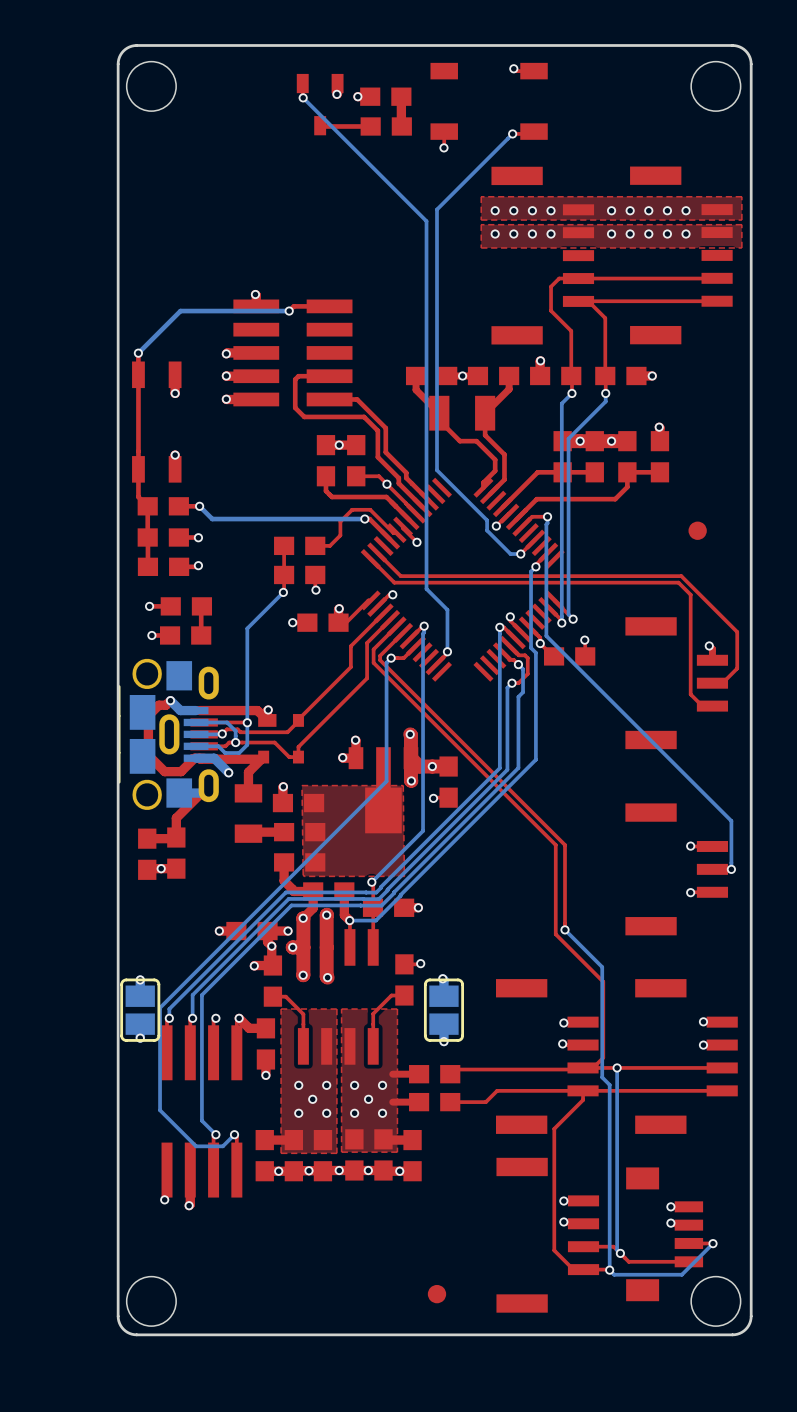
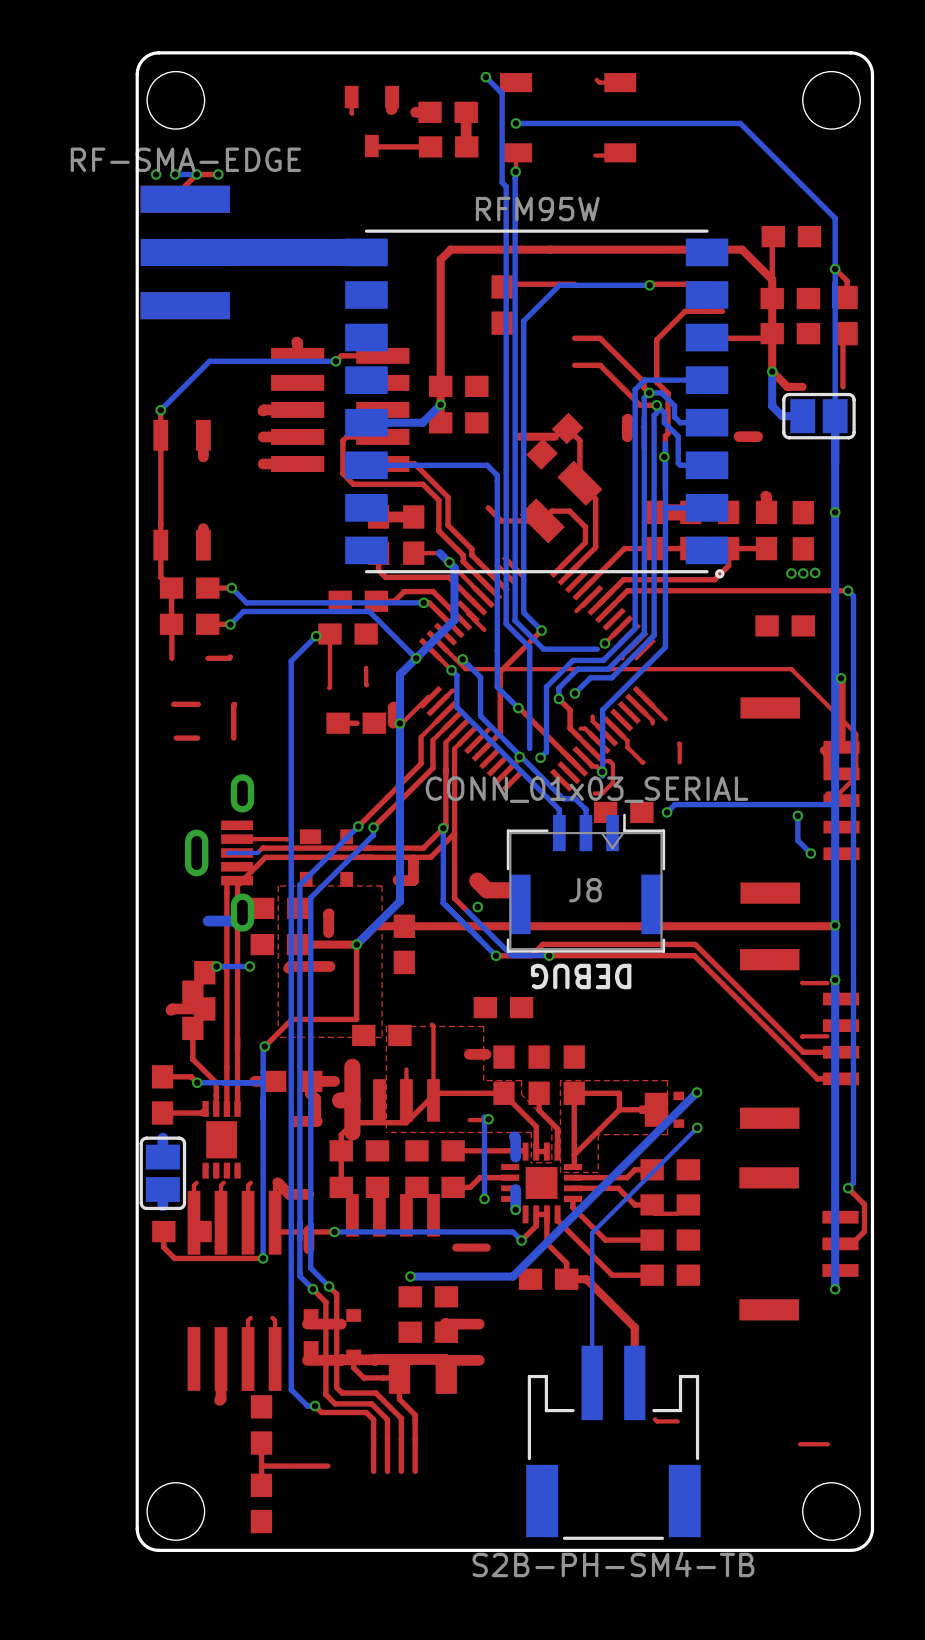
bottom track: none -> (485, 77) (502, 93) (502, 182) (506, 186) (506, 624) (529, 647) (529, 748)
via: none -> (485, 77)
via: (513, 68) -> none
via: (336, 94) -> none
via: (357, 96) -> none
bottom track: (303, 97) (426, 221) (426, 588) (447, 609) (447, 651) -> none
via: (303, 97) -> none
bottom track: none -> (515, 123) (740, 123) (835, 218) (835, 1289)
via: none -> (515, 123)
bottom track: (512, 133) (436, 209) (436, 470) (487, 520) (487, 530) (510, 554) (520, 554) -> none
via: (512, 133) -> none
via: none -> (156, 174)
via: none -> (175, 174)
bottom track: none -> (196, 174) (175, 174)
via: none -> (196, 174)
top track: none -> (218, 174) (196, 174) (185, 185)
via: none -> (218, 174)
bottom track: none -> (515, 177) (515, 620) (543, 649) (597, 649)
part footprint: [630, 166, 733, 345] -> [760, 287, 821, 310]
top zone outline: (741, 196) (741, 220) (481, 220) (481, 196) (741, 196) -> none
top track: none -> (773, 236) (772, 298)
part: none -> (791, 236)
via: (495, 210) -> none
via: (513, 210) -> none
via: (532, 210) -> none
via: (551, 210) -> none
via: (611, 210) -> none
via: (630, 210) -> none
via: (648, 210) -> none
via: (667, 210) -> none
via: (686, 210) -> none
part: none -> RF-SMA-EDGE (185, 252)
bottom track: none -> (366, 252) (185, 252)
top zone outline: (741, 224) (741, 247) (481, 247) (481, 224) (741, 224) -> none
top track: none -> (835, 269) (847, 280) (847, 297)
via: none -> (835, 269)
via: (495, 234) -> none
via: (513, 234) -> none
via: (532, 234) -> none
via position: (551, 234) -> (649, 285)
via: (611, 234) -> none
via: (630, 234) -> none
via: (648, 234) -> none
via: (667, 234) -> none
via: (686, 234) -> none
top track: none -> (574, 284) (504, 284) (502, 286)
top track: none -> (710, 284) (649, 285)
bottom track: none -> (649, 285) (559, 285) (523, 320) (523, 612) (541, 630) (542, 629)
part: (542, 255) -> none
part: none -> (502, 305)
top track: none -> (722, 311) (685, 311) (656, 339) (656, 382) (668, 393) (668, 433) (665, 436) (665, 443)
part: none -> (847, 315)
top track: (716, 278) (559, 278) (551, 286) (551, 310) (571, 331) (571, 393) -> none
part: none -> (790, 333)
top track: none -> (847, 333) (842, 337) (842, 386)
top track: none -> (574, 338) (600, 338) (643, 382) (643, 387) (649, 392)
top track: none -> (767, 338) (710, 338)
via: (255, 294) -> none
top track: (578, 301) (588, 301) (605, 318) (605, 393) -> none
top track: (717, 301) (578, 301) -> none
top track: none -> (574, 365) (600, 365) (640, 405) (656, 405)
bottom track: none -> (772, 371) (772, 406) (782, 416) (802, 416)
via: none -> (772, 371)
bottom track: none -> (707, 380) (644, 380) (635, 389) (635, 628) (603, 660) (573, 660) (546, 687) (546, 751) (540, 757)
part: none -> (458, 386)
top track: none -> (802, 386) (787, 386) (772, 371) (772, 279) (742, 249) (450, 249) (440, 259) (440, 422)
via: none -> (649, 392)
part: none -> RFM95W (536, 404)
bottom track: none -> (440, 404) (422, 422) (366, 422)
via: none -> (440, 404)
via: none -> (656, 405)
via: (226, 353) -> none
part: none -> (818, 416)
via: (540, 360) -> none
bottom track: none -> (707, 422) (680, 422) (674, 416) (674, 405) (661, 392) (649, 392) (644, 397) (644, 633) (608, 669) (577, 669) (558, 688) (558, 698)
part: none -> (458, 422)
via: (226, 375) -> none
top track: (416, 375) (416, 389) (439, 413) (439, 420) (459, 441) (476, 441) (495, 459) (495, 470) (483, 482) (483, 487) -> (488, 507) (501, 520) (542, 520) (552, 511) (569, 511) (585, 526) (585, 542) (561, 566)
part: (431, 375) -> none
via: (462, 375) -> none
part rotation: 0° (493, 375) -> 45° counterclockwise (554, 441)
top track: (509, 375) (509, 389) (485, 413) (485, 435) (504, 454) (504, 479) -> (567, 428) (579, 440) (579, 483) (595, 499) (595, 547) (585, 557)
part: (555, 375) -> none
part: (620, 375) -> none
via: (652, 375) -> none
bottom track: none -> (665, 443) (665, 647) (602, 709) (602, 776)
via: (175, 393) -> none
bottom track: (571, 393) (561, 403) (561, 623) -> none
bottom track: (605, 393) (605, 401) (568, 438) (568, 614) (573, 619) -> none
via: (605, 393) -> none
via: (226, 399) -> none
bottom track: none -> (359, 465) (487, 465) (497, 475) (497, 687) (518, 708)
bottom track: none -> (707, 465) (680, 465) (678, 463) (678, 436) (664, 422) (664, 412) (656, 405) (656, 412) (654, 415) (654, 635) (611, 677) (590, 677) (574, 693)
part: (462, 413) -> none
via: (659, 427) -> none
part: none -> (561, 502)
bottom track: none -> (707, 507) (665, 507)
via: (580, 441) -> none
via: (611, 441) -> none
via: none -> (835, 512)
via: (339, 445) -> none
via: (175, 455) -> none
part: none -> (803, 530)
bottom track: none -> (439, 553) (454, 567) (454, 620) (399, 674) (399, 901) (356, 944)
via: none -> (791, 573)
via: none -> (803, 573)
via: none -> (815, 572)
bottom track: none -> (848, 590) (853, 596) (853, 1182) (848, 1188)
via: none -> (848, 590)
top track: (352, 509) (370, 509) (393, 533) (396, 533) -> (376, 601) (394, 601) (404, 591) (433, 591) (460, 619)
top track: (352, 510) (340, 521) (340, 535) (329, 545) (315, 545) -> none
top track: (547, 516) (532, 516) -> (848, 590) (627, 590) (618, 600)
bottom track: (547, 516) (546, 635) (731, 821) (731, 869) -> none
via: (547, 516) -> none
via: (496, 526) -> none
part: (697, 530) -> none
bottom track: none -> (231, 623) (243, 611) (369, 611) (416, 658)
part: none -> (785, 625)
via: (416, 542) -> none
via: none -> (541, 630)
bottom track: none -> (316, 636) (291, 661) (291, 1389) (307, 1406) (315, 1406)
via: none -> (316, 636)
via: (198, 565) -> none
part: (163, 566) -> none
via: none -> (416, 658)
bottom track: (535, 566) (531, 571) (531, 647) (535, 652) (535, 759) (375, 920) (349, 920) -> none
via: (535, 566) -> none
bottom track: none -> (462, 659) (480, 677) (480, 716) (563, 798) (575, 798) (585, 809) (585, 833)
via: none -> (462, 659)
part position: (299, 574) -> (358, 601)
top track: (388, 577) (394, 582) (678, 582) (690, 594) (690, 694) (702, 706) (712, 706) -> none
bottom track: none -> (451, 670) (456, 675) (456, 707) (559, 809) (559, 833)
via: none -> (451, 670)
top track: none -> (841, 678) (841, 747)
via: none -> (841, 678)
via: (315, 590) -> none
bottom track: (283, 592) (247, 628) (247, 744) (239, 753) (225, 753) (218, 746) (196, 746) -> none
via: (283, 592) -> none
via: (392, 594) -> none
via: none -> (574, 693)
top track: none -> (558, 698) (570, 710) (570, 728) (580, 738)
via: none -> (558, 698)
via: (149, 606) -> none
part: (186, 606) -> none
via position: (339, 608) -> (399, 723)
top track: none -> (518, 708) (576, 765)
via: none -> (518, 708)
via: (510, 616) -> none
part footprint: [625, 617, 729, 750] -> [740, 697, 860, 904]
via: (573, 619) -> none
via: (292, 622) -> none
part position: (322, 622) -> (356, 723)
via: (561, 623) -> none
bottom track: (424, 626) (423, 830) (371, 882) -> none
via: (424, 626) -> none
bottom track: (499, 627) (499, 768) (376, 892) (285, 892) (169, 1009) (169, 1018) -> none
via: (499, 627) -> none
top track: (362, 634) (350, 646) (350, 667) (287, 732) (240, 732) (237, 729) (226, 729) -> (421, 737) (421, 763) (358, 826)
via: (151, 635) -> none
part: (185, 635) -> none
top track: (372, 637) (367, 642) (367, 678) (298, 746) (298, 757) (289, 757) (274, 742) (229, 742) (225, 746) (199, 746) -> (432, 740) (432, 768) (373, 827)
top track: (383, 639) (373, 649) (373, 662) (555, 845) (555, 934) (603, 981) (603, 1057) (593, 1067) -> (445, 742) (445, 825) (423, 848) (262, 848)
via: (584, 640) -> none
via: (540, 643) -> none
top track: (391, 644) (380, 655) (380, 660) (565, 845) (565, 929) -> (454, 748) (454, 898) (467, 911)
top track: (416, 645) (403, 658) (391, 658) -> (483, 750) (500, 733) (500, 671) (541, 630)
via: (709, 645) -> none
via: none -> (540, 757)
part position: (569, 656) -> (623, 812)
bottom track: (391, 658) (386, 662) (386, 781) (160, 1007) (160, 1110) (196, 1146) (222, 1146) (234, 1134) -> none
via: (391, 658) -> none
bottom track: (518, 664) (523, 669) (523, 692) (518, 696) (518, 767) (381, 905) (360, 905) -> none
bottom track: (512, 683) (507, 687) (507, 769) (378, 899) (363, 899) -> none
via: (512, 683) -> none
bottom track: none -> (834, 804) (674, 804) (667, 812)
via: none -> (667, 812)
top track: (170, 700) (165, 705) (158, 705) (148, 715) (148, 755) (164, 771) (181, 771) (194, 758) (204, 758) -> none
bottom track: (170, 700) (180, 710) (196, 710) -> none
via: (170, 700) -> none
bottom track: none -> (797, 815) (797, 840) (810, 853)
via: none -> (797, 815)
top track: (268, 709) (267, 720) (257, 710) (199, 710) -> none
via: (268, 709) -> none
bottom track: none -> (358, 826) (299, 884) (299, 1276) (312, 1289)
via: none -> (358, 826)
bottom track: none -> (373, 827) (373, 835) (310, 897) (310, 1268) (329, 1286)
via: none -> (373, 827)
bottom track: none -> (443, 828) (443, 903) (496, 955)
via: none -> (443, 828)
top track: none -> (454, 833) (430, 857) (265, 857) (237, 885) (237, 1108)
bottom track: (196, 722) (227, 722) (235, 731) (235, 742) -> none
via: (247, 722) -> none
via: (222, 733) -> none
part: (163, 734) -> none
top track: (410, 734) (411, 780) -> none
via: (410, 734) -> none
via: none -> (810, 853)
via: (355, 740) -> none
via: (235, 742) -> none
top track: (263, 757) (248, 772) (248, 793) -> none
via: (342, 757) -> none
bottom track: (196, 758) (214, 758) (228, 772) -> none
top track: (199, 758) (261, 759) -> none
top track: none -> (226, 883) (226, 1108)
J8: none -> CONN_01x03_SERIAL (585, 883)
top zone outline: none -> (382, 885) (278, 885) (278, 1037) (382, 1037) (382, 885)
via: (432, 766) -> none
via: (228, 772) -> none
part: none -> (280, 908)
part: (448, 782) -> none
part footprint: [234, 784, 263, 843] -> [250, 933, 311, 956]
bottom track: none -> (467, 911) (511, 955) (549, 955)
top track: (208, 785) (176, 818) (175, 838) (147, 838) -> none
top zone outline: (403, 785) (302, 785) (303, 875) (404, 876) (403, 785) -> none
via: (283, 786) -> none
part: (383, 790) -> none
top track: none -> (835, 925) (375, 926) (356, 944)
via: none -> (835, 925)
via: (433, 798) -> none
part: (298, 803) -> none
top track: none -> (299, 943) (298, 944) (356, 944)
top track: none -> (356, 944) (356, 1019) (291, 1019) (264, 1046)
via: none -> (356, 944)
part: none -> (404, 944)
top track: none -> (496, 955) (531, 955) (542, 944) (695, 944) (803, 1052) (841, 1052)
via: none -> (496, 955)
top track: none -> (549, 955) (694, 955) (817, 1078) (841, 1078)
via: none -> (549, 955)
via: none -> (216, 966)
bottom track: none -> (249, 966) (216, 966)
via: none -> (249, 966)
part: (299, 832) -> none
text: none -> DEBUG (581, 976)
via: none -> (835, 980)
via: (690, 846) -> none
part position: (147, 854) -> (192, 1010)
top track: (284, 862) (284, 880) (293, 891) (313, 891) (313, 908) (303, 918) -> none
part: (299, 862) -> none
part: none -> (503, 1007)
via: (161, 868) -> none
part: (676, 869) -> none
via: (731, 869) -> none
via: (371, 882) -> none
top zone outline: none -> (483, 1026) (386, 1026) (386, 1132) (531, 1132) (531, 1162) (551, 1162) (551, 1124) (521, 1094) (521, 1080) (483, 1080) (483, 1026)
top track: none -> (192, 1028) (192, 1059) (216, 1082) (216, 1108)
top track: (344, 891) (344, 915) (349, 920) -> none
via: (690, 892) -> none
part: none -> (799, 1038)
bottom track: (363, 898) (288, 898) (192, 995) (192, 1018) -> none
bottom track: none -> (264, 1046) (263, 1048) (263, 1258)
via: none -> (264, 1046)
bottom track: (360, 905) (291, 905) (201, 995) (201, 1120) (215, 1134) -> none
part: (388, 907) -> none
via: (418, 907) -> none
top track: (327, 914) (327, 977) -> none
via: (326, 915) -> none
via: (303, 918) -> none
via: (349, 920) -> none
part: none -> (503, 1075)
part: none -> (539, 1075)
part: none -> (574, 1075)
top track: none -> (163, 1077) (191, 1076) (197, 1082)
bottom track: (565, 929) (602, 967) (602, 1077) (609, 1084) (609, 1270) (614, 1274) (681, 1274) (713, 1243) -> none
via: (565, 929) -> none
top zone outline: none -> (667, 1080) (560, 1080) (560, 1172) (598, 1172) (598, 1134) (667, 1134) (667, 1080)
via: (219, 931) -> none
via: (288, 931) -> none
bottom track: none -> (197, 1082) (263, 1083)
via: none -> (197, 1082)
bottom track: none -> (696, 1092) (512, 1276) (410, 1276)
via: none -> (696, 1092)
top track: none -> (539, 1093) (539, 1110) (557, 1128) (557, 1151)
part: none -> (162, 1094)
via: (271, 946) -> none
via: (292, 947) -> none
top track: none -> (205, 1108) (201, 1113) (162, 1113)
top track: none -> (619, 1109) (574, 1154)
top track: none -> (619, 1109) (619, 1093) (574, 1093) (572, 1167)
top track: none -> (656, 1109) (619, 1109)
part: none -> (661, 1109)
bottom track: none -> (484, 1117) (484, 1198)
via: (254, 965) -> none
bottom track: none -> (697, 1127) (592, 1232) (592, 1382)
via: none -> (697, 1127)
via: (303, 975) -> none
via: (327, 977) -> none
via: (442, 978) -> none
via: (140, 979) -> none
part: (404, 979) -> none
part footprint: [635, 979, 738, 1134] -> [739, 1167, 859, 1321]
part: none -> (221, 1139)
part: (272, 981) -> none
part: none -> (359, 1150)
part: none -> (435, 1150)
top track: none -> (453, 1150) (525, 1151)
top track: none -> (546, 1151) (536, 1151) (536, 1126) (503, 1093) (435, 1093) (406, 1122) (353, 1122) (341, 1134) (341, 1187)
top track: (404, 995) (391, 995) (373, 1013) (373, 1046) -> none
top track: (272, 996) (285, 996) (303, 1014) (303, 1046) -> none
top track: none -> (652, 1169) (635, 1169) (627, 1177) (572, 1177)
part: none -> (670, 1169)
top zone outline: (336, 1009) (336, 1153) (281, 1153) (281, 1009) (336, 1009) -> none
top zone outline: (397, 1009) (341, 1009) (341, 1152) (397, 1152) (397, 1009) -> none
part: (443, 1010) -> none
top track: none -> (510, 1177) (479, 1177) (470, 1187) (453, 1187)
via: (169, 1018) -> none
via: (192, 1018) -> none
via: (215, 1018) -> none
via: (239, 1018) -> none
part: none -> (541, 1182)
via: (703, 1021) -> none
part: none -> (359, 1187)
part: none -> (435, 1187)
via: (563, 1022) -> none
top track: none -> (848, 1188) (864, 1204) (864, 1231) (852, 1243) (840, 1243)
via: none -> (848, 1188)
top track: none -> (572, 1188) (618, 1188) (635, 1204) (652, 1204)
via: none -> (484, 1198)
top track: none -> (572, 1198) (572, 1207) (605, 1240) (652, 1240)
part: none -> (670, 1204)
via: (140, 1038) -> none
part: (265, 1043) -> none
via: (562, 1043) -> none
top track: none -> (557, 1214) (557, 1220) (612, 1275) (652, 1275)
via: (703, 1045) -> none
part: (547, 1056) -> none
top track: none -> (163, 1231) (163, 1247) (174, 1258) (263, 1258)
part: none -> (181, 1231)
top track: none -> (278, 1231) (334, 1231)
bottom track: none -> (334, 1231) (512, 1231) (521, 1240)
via: none -> (334, 1231)
part: none -> (670, 1240)
bottom track: (617, 1067) (617, 1250) (620, 1253) -> none
via: (617, 1067) -> none
top track: (722, 1067) (454, 1069) (450, 1074) -> none
top track: none -> (521, 1240) (536, 1225) (536, 1214) (546, 1214) (546, 1243) (566, 1263) (566, 1279) (586, 1279) (634, 1327) (634, 1382) (634, 1346)
via: none -> (521, 1240)
part: (434, 1074) -> none
via: (265, 1075) -> none
via: none -> (263, 1258)
via: (298, 1085) -> none
via: (326, 1085) -> none
via: (354, 1085) -> none
via: (382, 1085) -> none
top track: (583, 1090) (583, 1100) (554, 1128) (554, 1250) (573, 1269) (609, 1270) -> none
top track: (722, 1090) (497, 1090) (485, 1102) (450, 1102) -> none
part: none -> (670, 1275)
via: (312, 1099) -> none
via: none -> (410, 1276)
via: (368, 1099) -> none
part: none -> (548, 1279)
top track: (419, 1102) (392, 1102) -> none
part: (434, 1102) -> none
top track: none -> (329, 1286) (336, 1294) (336, 1387) (342, 1393) (375, 1393) (401, 1418) (401, 1471)
via: none -> (329, 1286)
top track: none -> (312, 1289) (325, 1302) (325, 1394) (335, 1403) (371, 1403) (387, 1419) (387, 1471)
via: none -> (312, 1289)
via: none -> (835, 1289)
via: (298, 1113) -> none
via: (326, 1113) -> none
via: (354, 1113) -> none
via: (382, 1113) -> none
part: none -> (428, 1296)
part footprint: [284, 1129, 304, 1182] -> [303, 1309, 362, 1363]
via: (215, 1134) -> none
via: (234, 1134) -> none
part: none -> (428, 1332)
part: (354, 1154) -> none
part: (383, 1154) -> none
part: (264, 1155) -> none
part: (322, 1155) -> none
part: (412, 1155) -> none
top track: none -> (353, 1355) (353, 1367) (363, 1377) (399, 1377) (399, 1399) (415, 1414) (415, 1471)
via: (308, 1170) -> none
via: (339, 1170) -> none
via: (368, 1170) -> none
via: (278, 1171) -> none
via: (399, 1171) -> none
part: none -> (422, 1377)
via: (164, 1199) -> none
via: (563, 1201) -> none
via: (189, 1205) -> none
via: (670, 1206) -> none
top track: none -> (315, 1406) (321, 1412) (366, 1412) (373, 1419) (373, 1471)
via: none -> (315, 1406)
via: (563, 1221) -> none
via: (670, 1223) -> none
part: none -> (261, 1424)
part: (664, 1234) -> none
part: (547, 1235) -> none
part: none -> S2B-PH-SM4-TB (613, 1442)
via: (713, 1243) -> none
top track: (583, 1246) (613, 1246) (628, 1261) (688, 1261) -> none
via: (620, 1253) -> none
top track: none -> (327, 1466) (261, 1466)
via: (609, 1270) -> none
part: none -> (261, 1503)
part: (436, 1294) -> none

